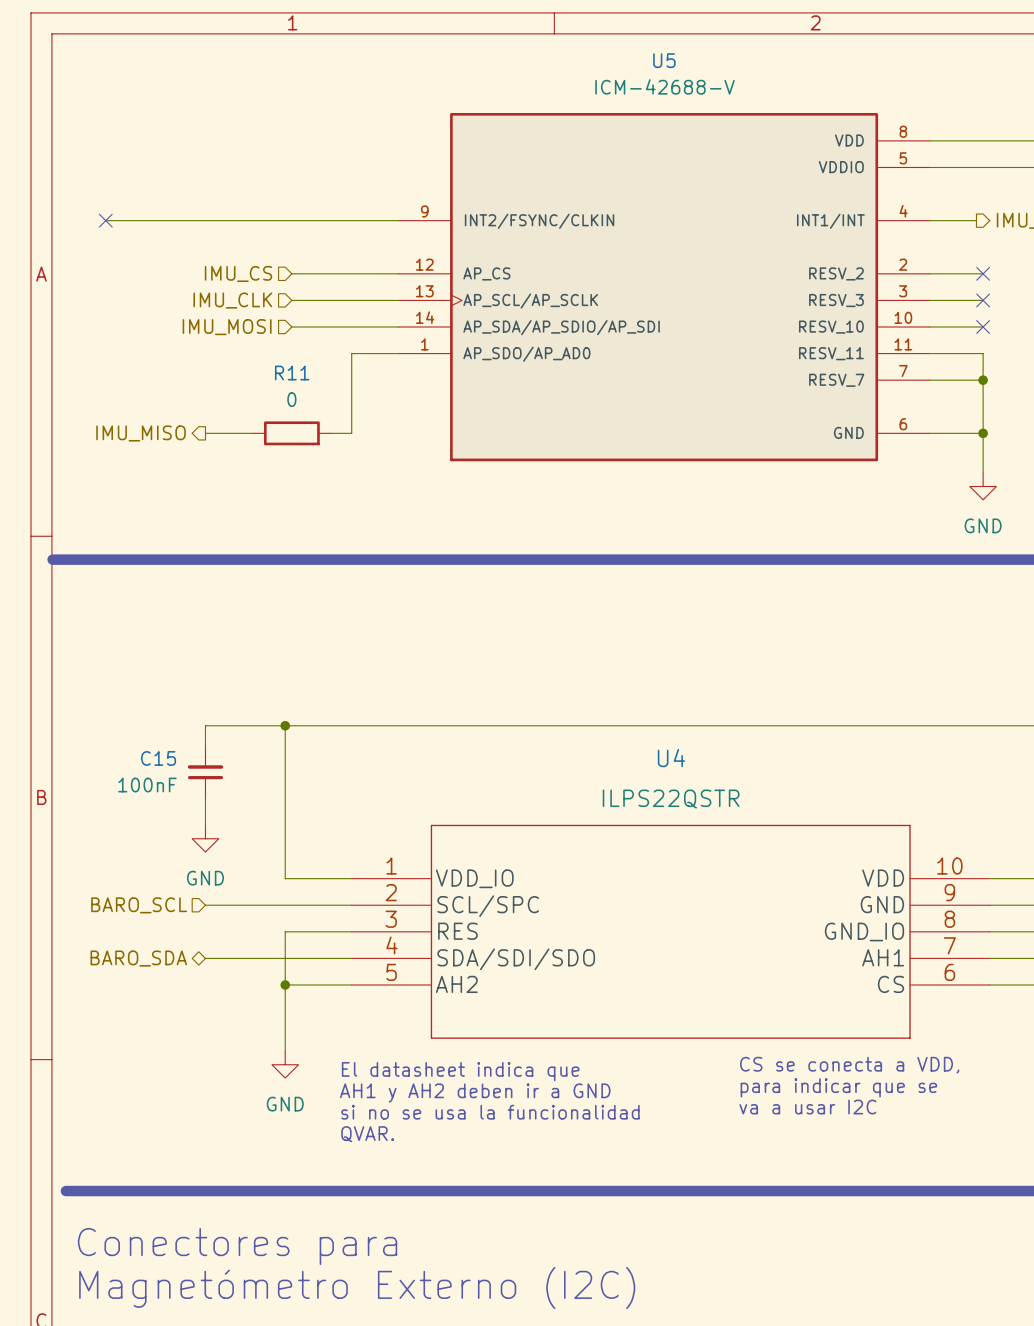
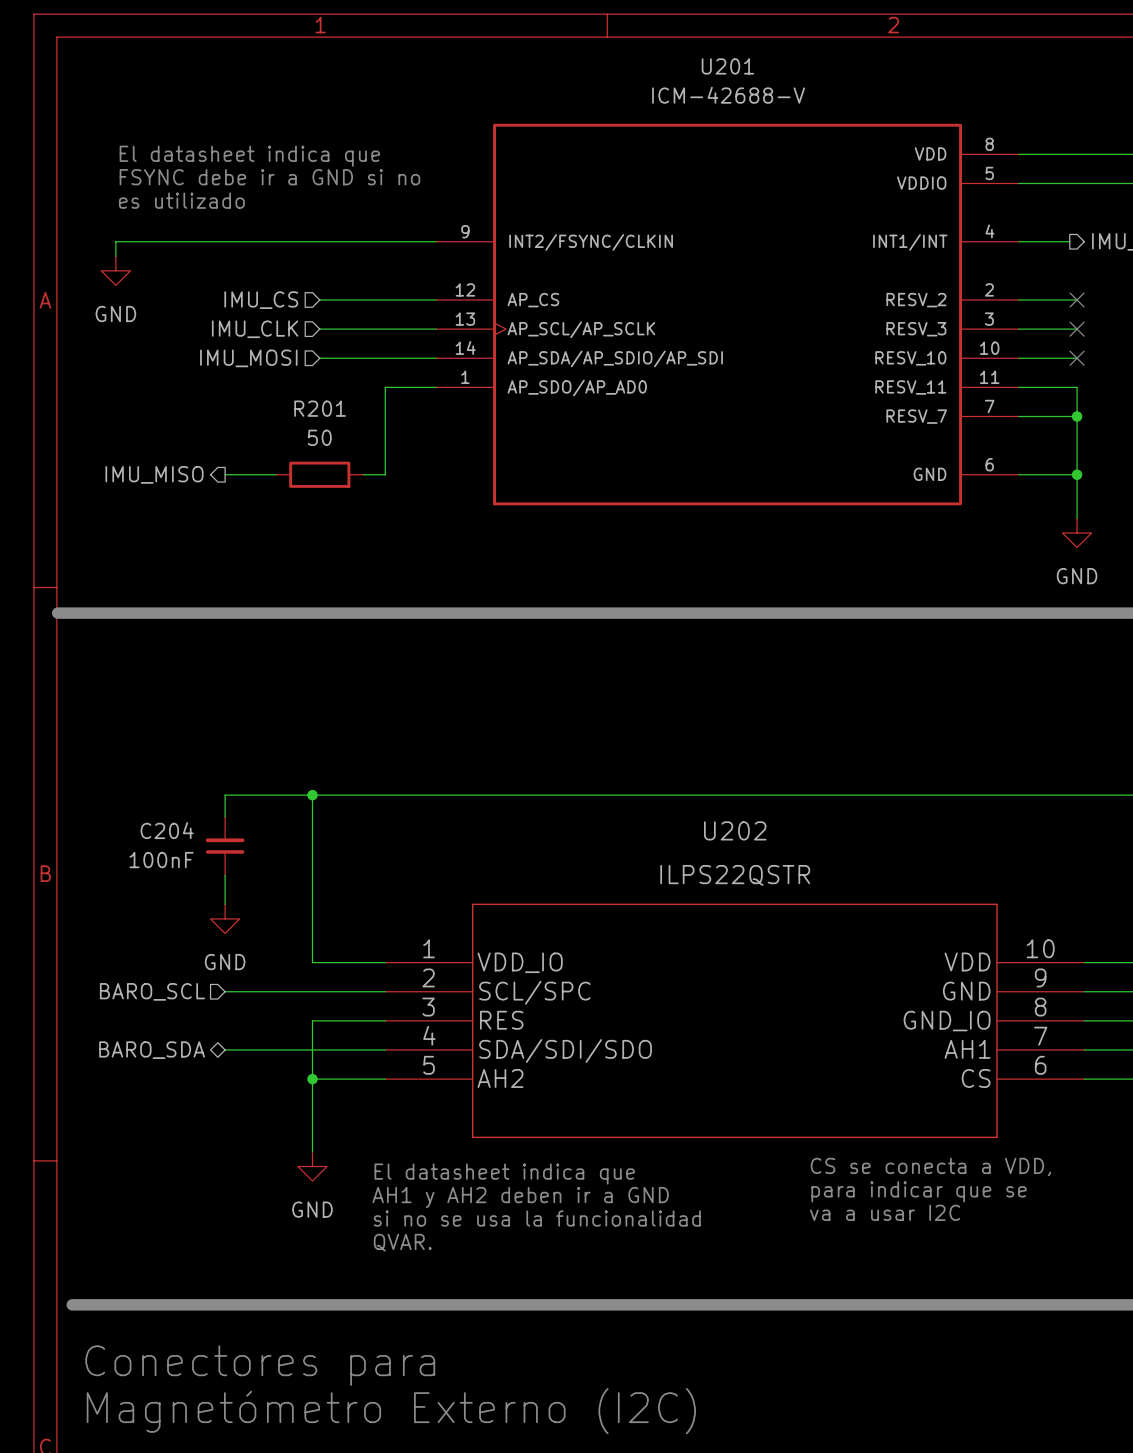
U5 name: U5 (664, 60) -> U201 (727, 66)
text: none -> El datasheet indica que (249, 156)
text: none -> FSYNC debe ir a GND si no (269, 177)
text: none -> es utilizado (181, 200)
wire: none -> (115, 241) (115, 256)
no-connect mark: (105, 220) -> none
power symbol: none -> GND (115, 270)
R11 name: R11 (292, 373) -> R201 (320, 408)
R11 value: 0 (291, 399) -> 50 (319, 437)
C15 name: C15 (158, 758) -> C204 (167, 830)
U4 name: U4 (671, 758) -> U202 (735, 830)

